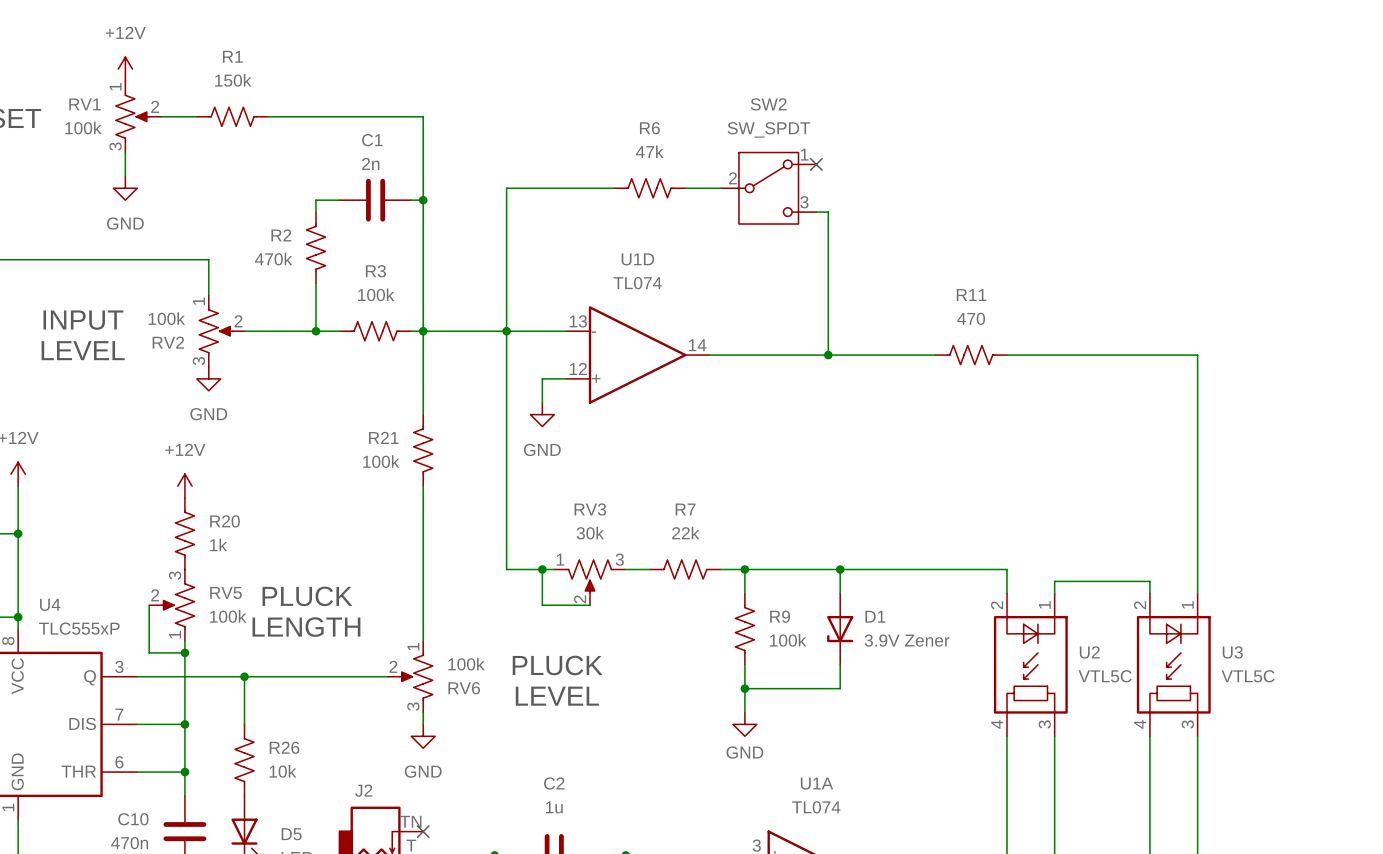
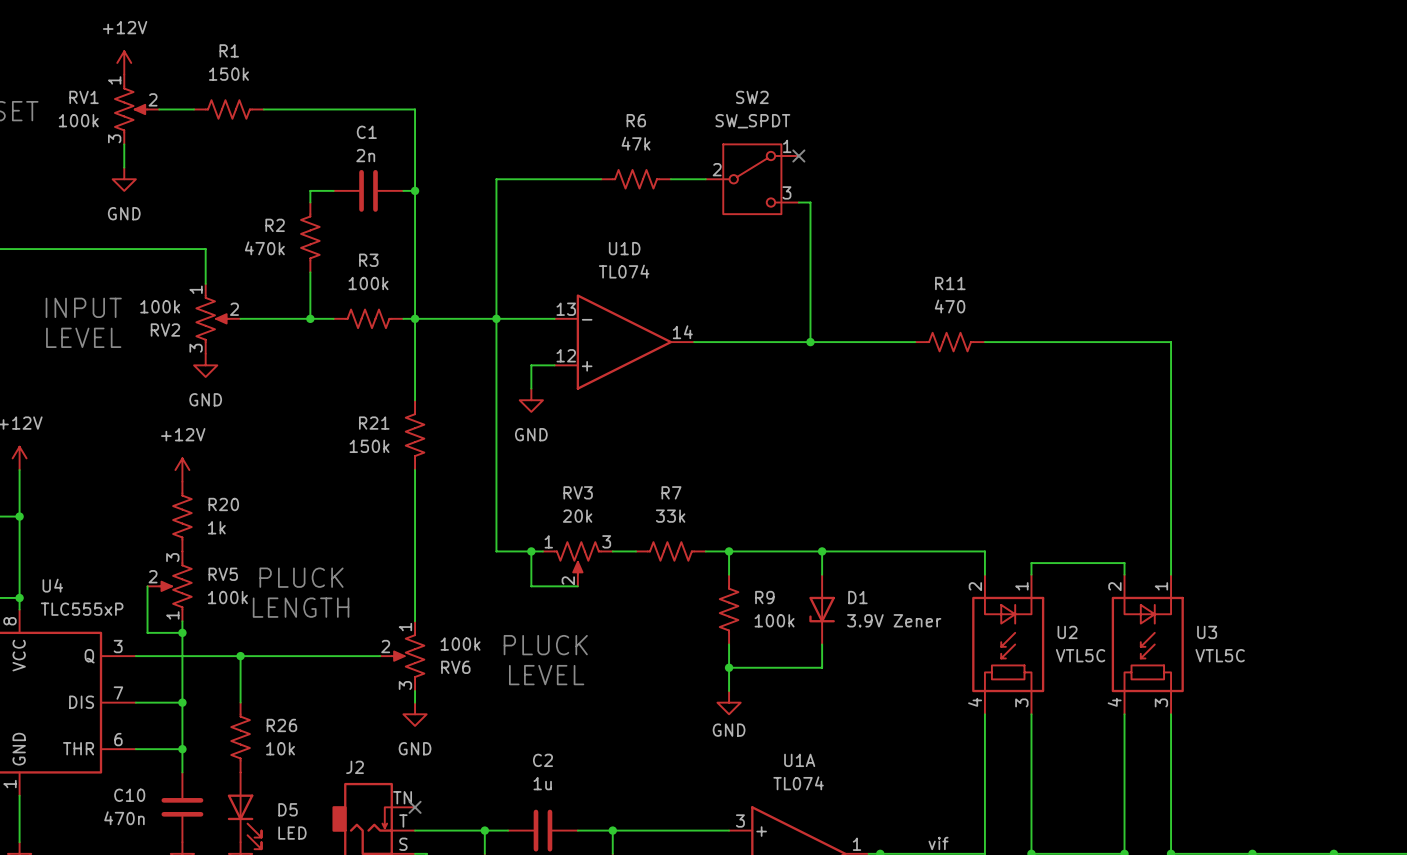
R21 value: 100k (381, 461) -> 150k (369, 446)
RV3 value: 30k (590, 533) -> 20k (577, 516)
R7 value: 22k (685, 533) -> 33k (670, 516)

